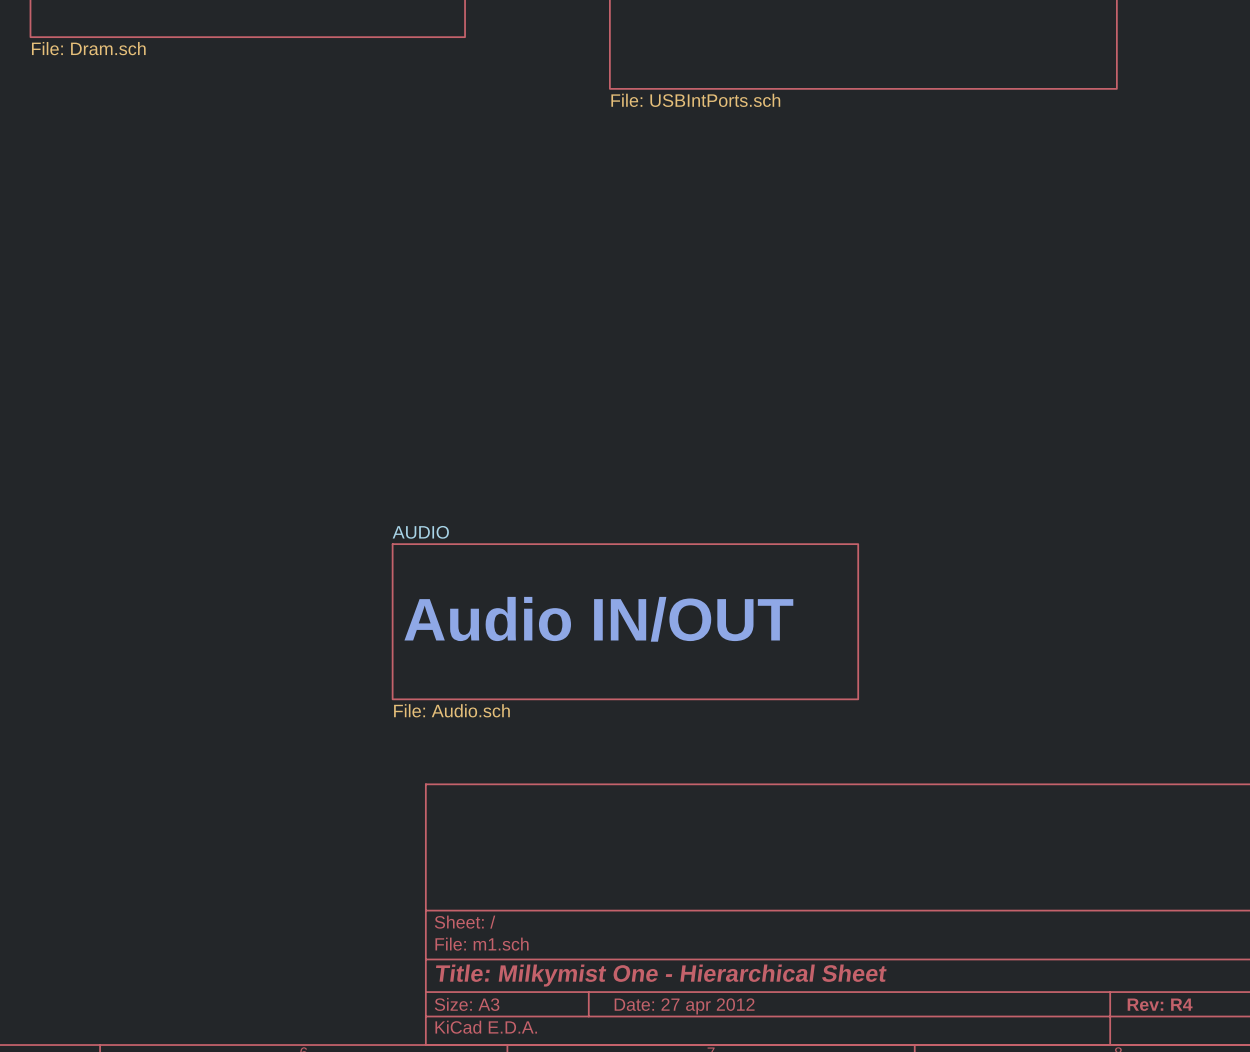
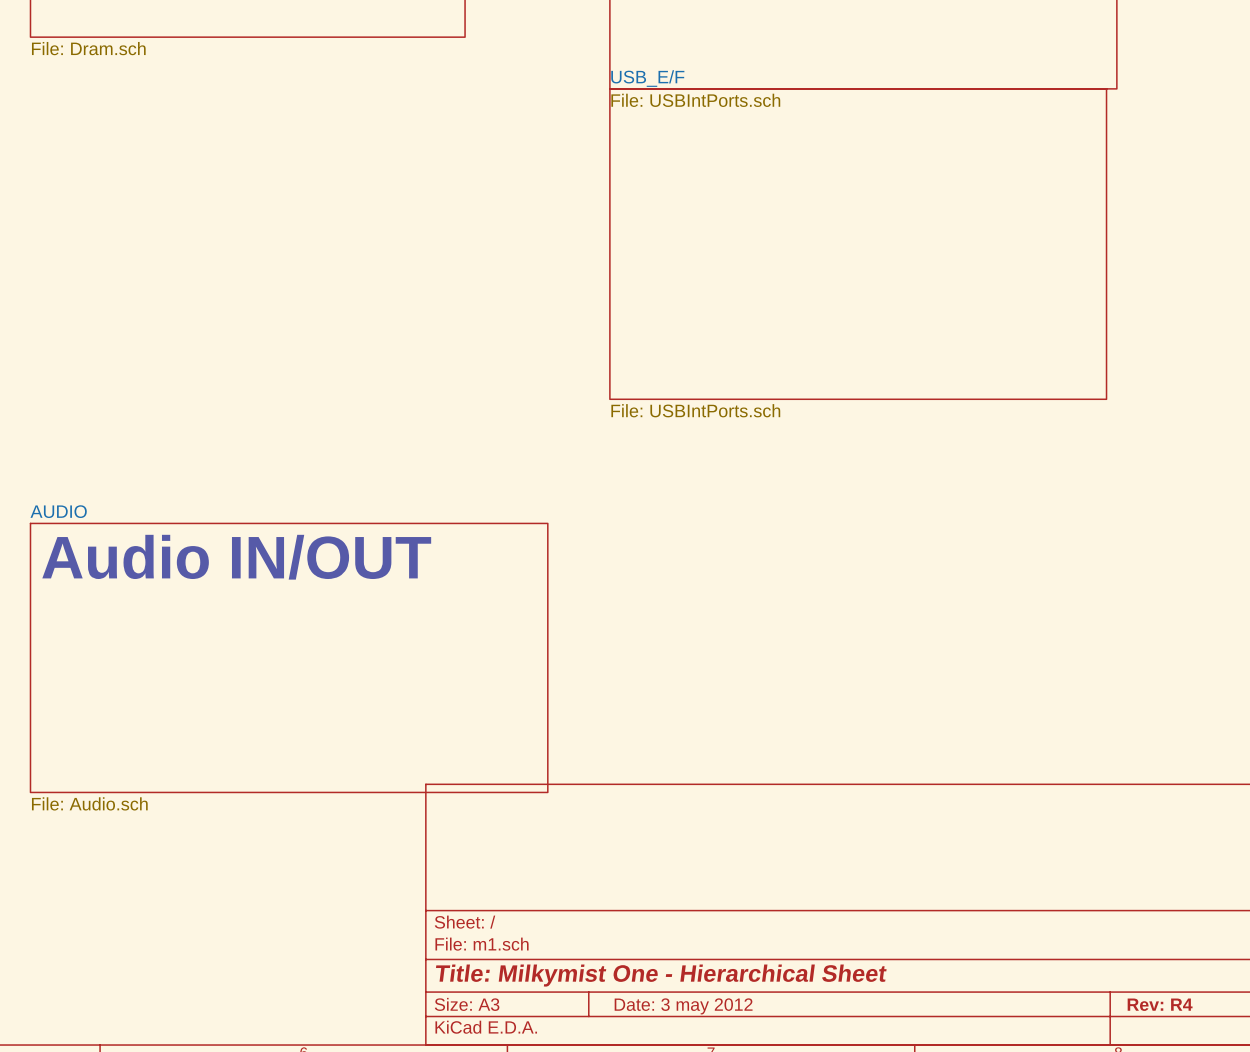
sheet USB_E/F: none -> File: USBIntPorts.sch (858, 244)
text: none -> Audio IN/OUT (236, 557)
text: Audio IN/OUT (598, 619) -> none
sheet AUDIO: File: Audio.sch (625, 621) -> none
sheet AUDIO: none -> File: Audio.sch (289, 657)
title block: Date: 27 apr 2012 (684, 1006) -> Date: 3 may 2012 (683, 1006)

